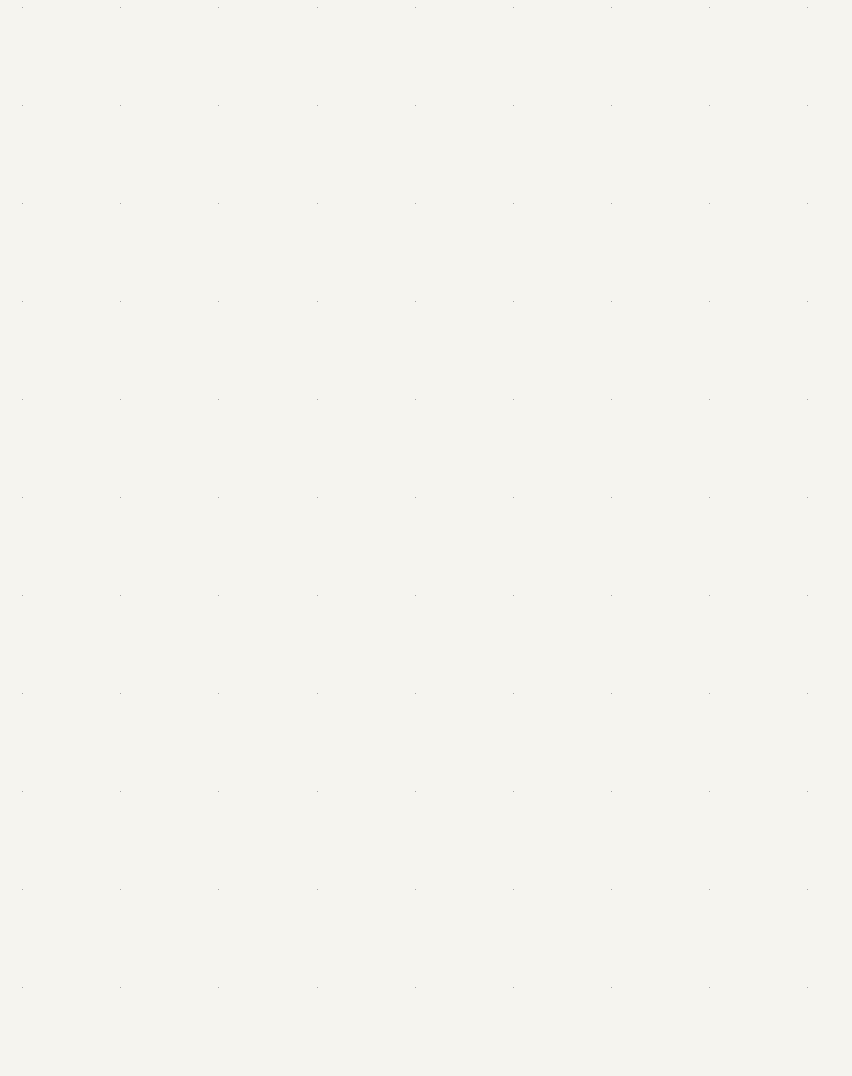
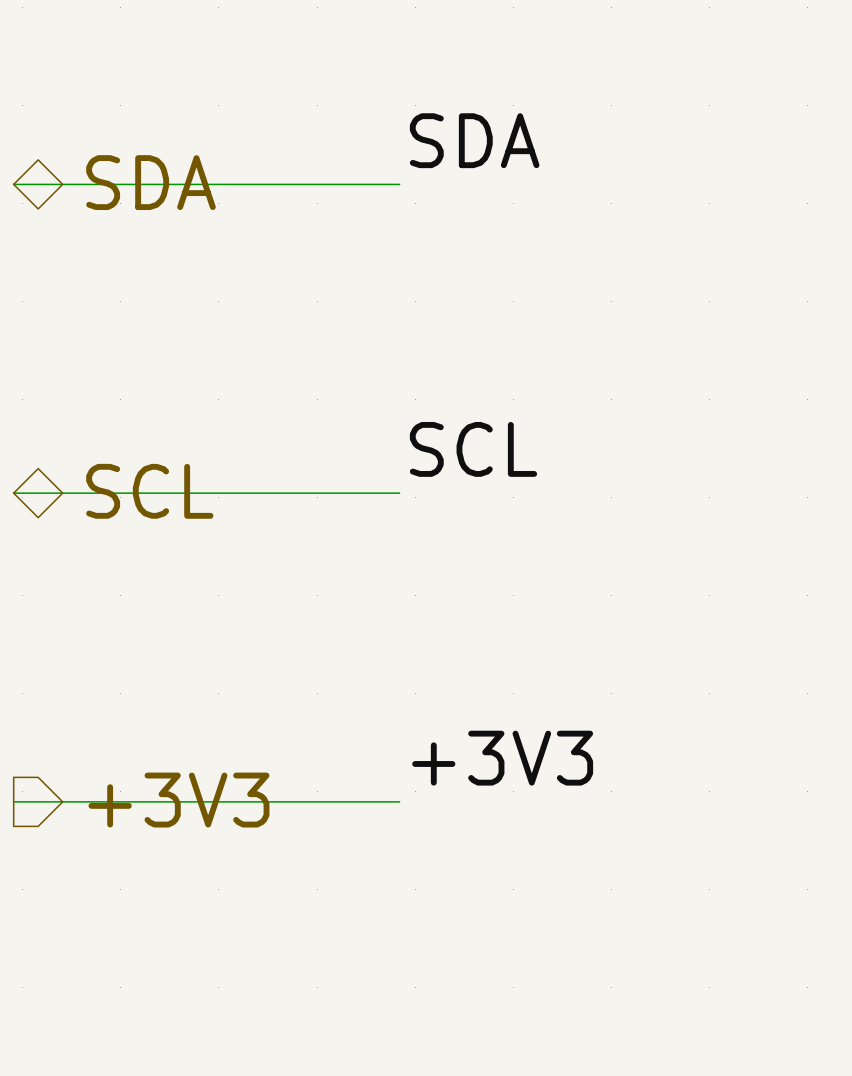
label: none -> SDA (474, 140)
hierarchical label: none -> SDA (150, 182)
wire: none -> (13, 184) (399, 184)
label: none -> SCL (473, 449)
hierarchical label: none -> SCL (149, 491)
wire: none -> (13, 493) (399, 493)
label: none -> +3V3 (502, 758)
hierarchical label: none -> +3V3 (178, 800)
wire: none -> (13, 801) (399, 801)

